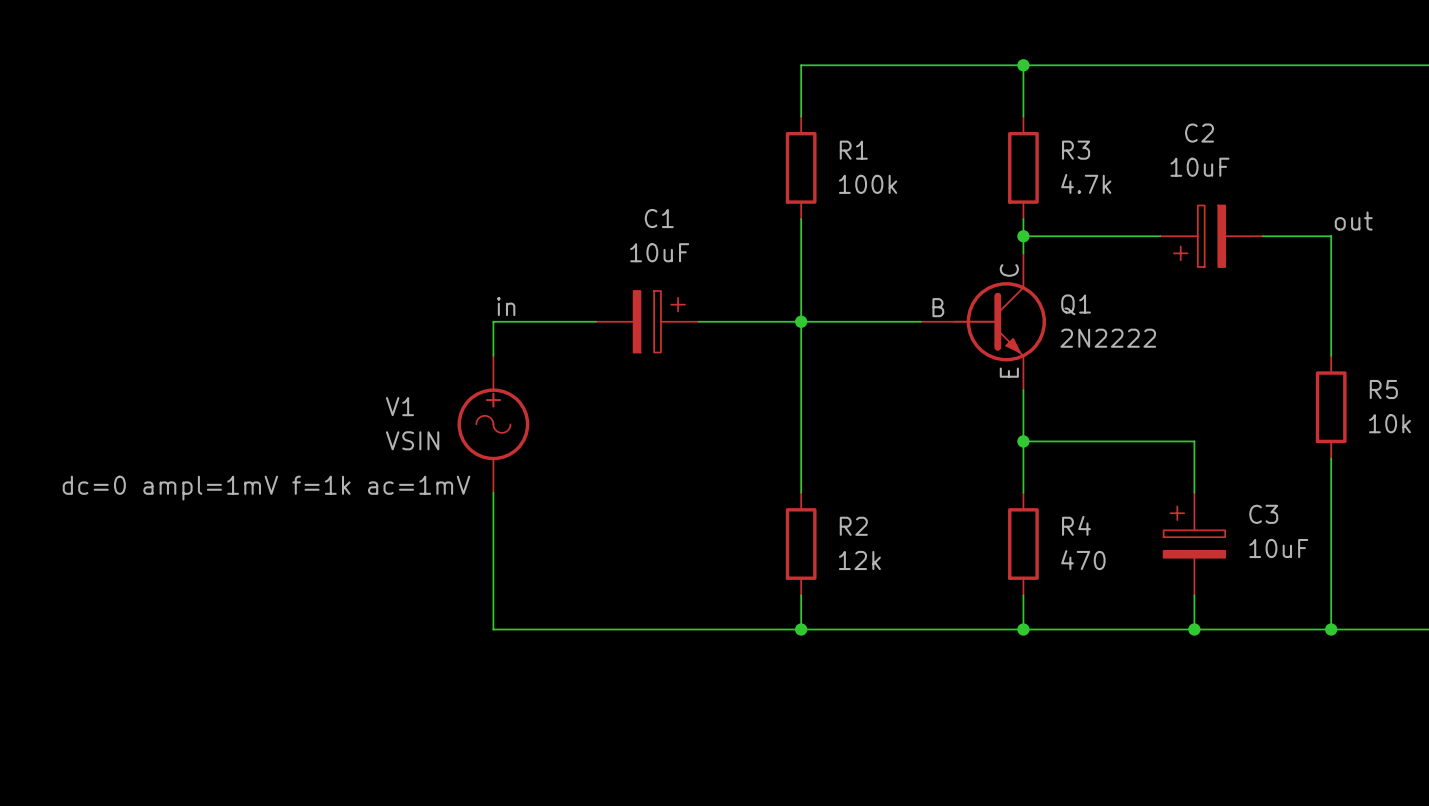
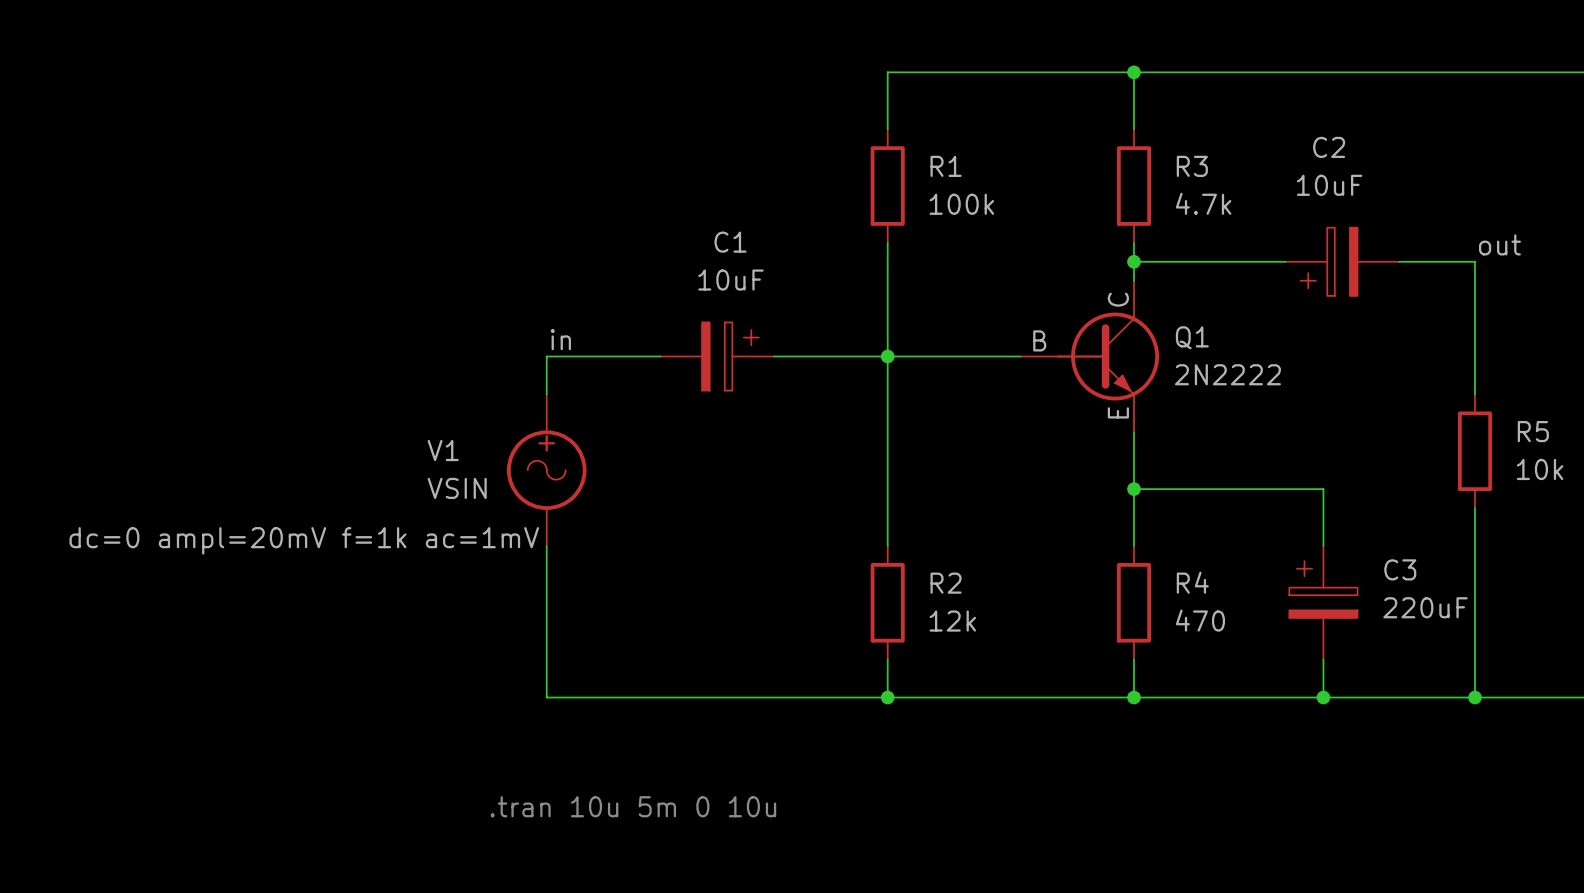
V1 text: dc=0 ampl=1mV f=1k ac=1mV (266, 488) -> dc=0 ampl=20mV f=1k ac=1mV (304, 540)
C3 value: 10uF (1278, 548) -> 220uF (1425, 607)
text: none -> .tran 10u 5m 0 10u (633, 806)

